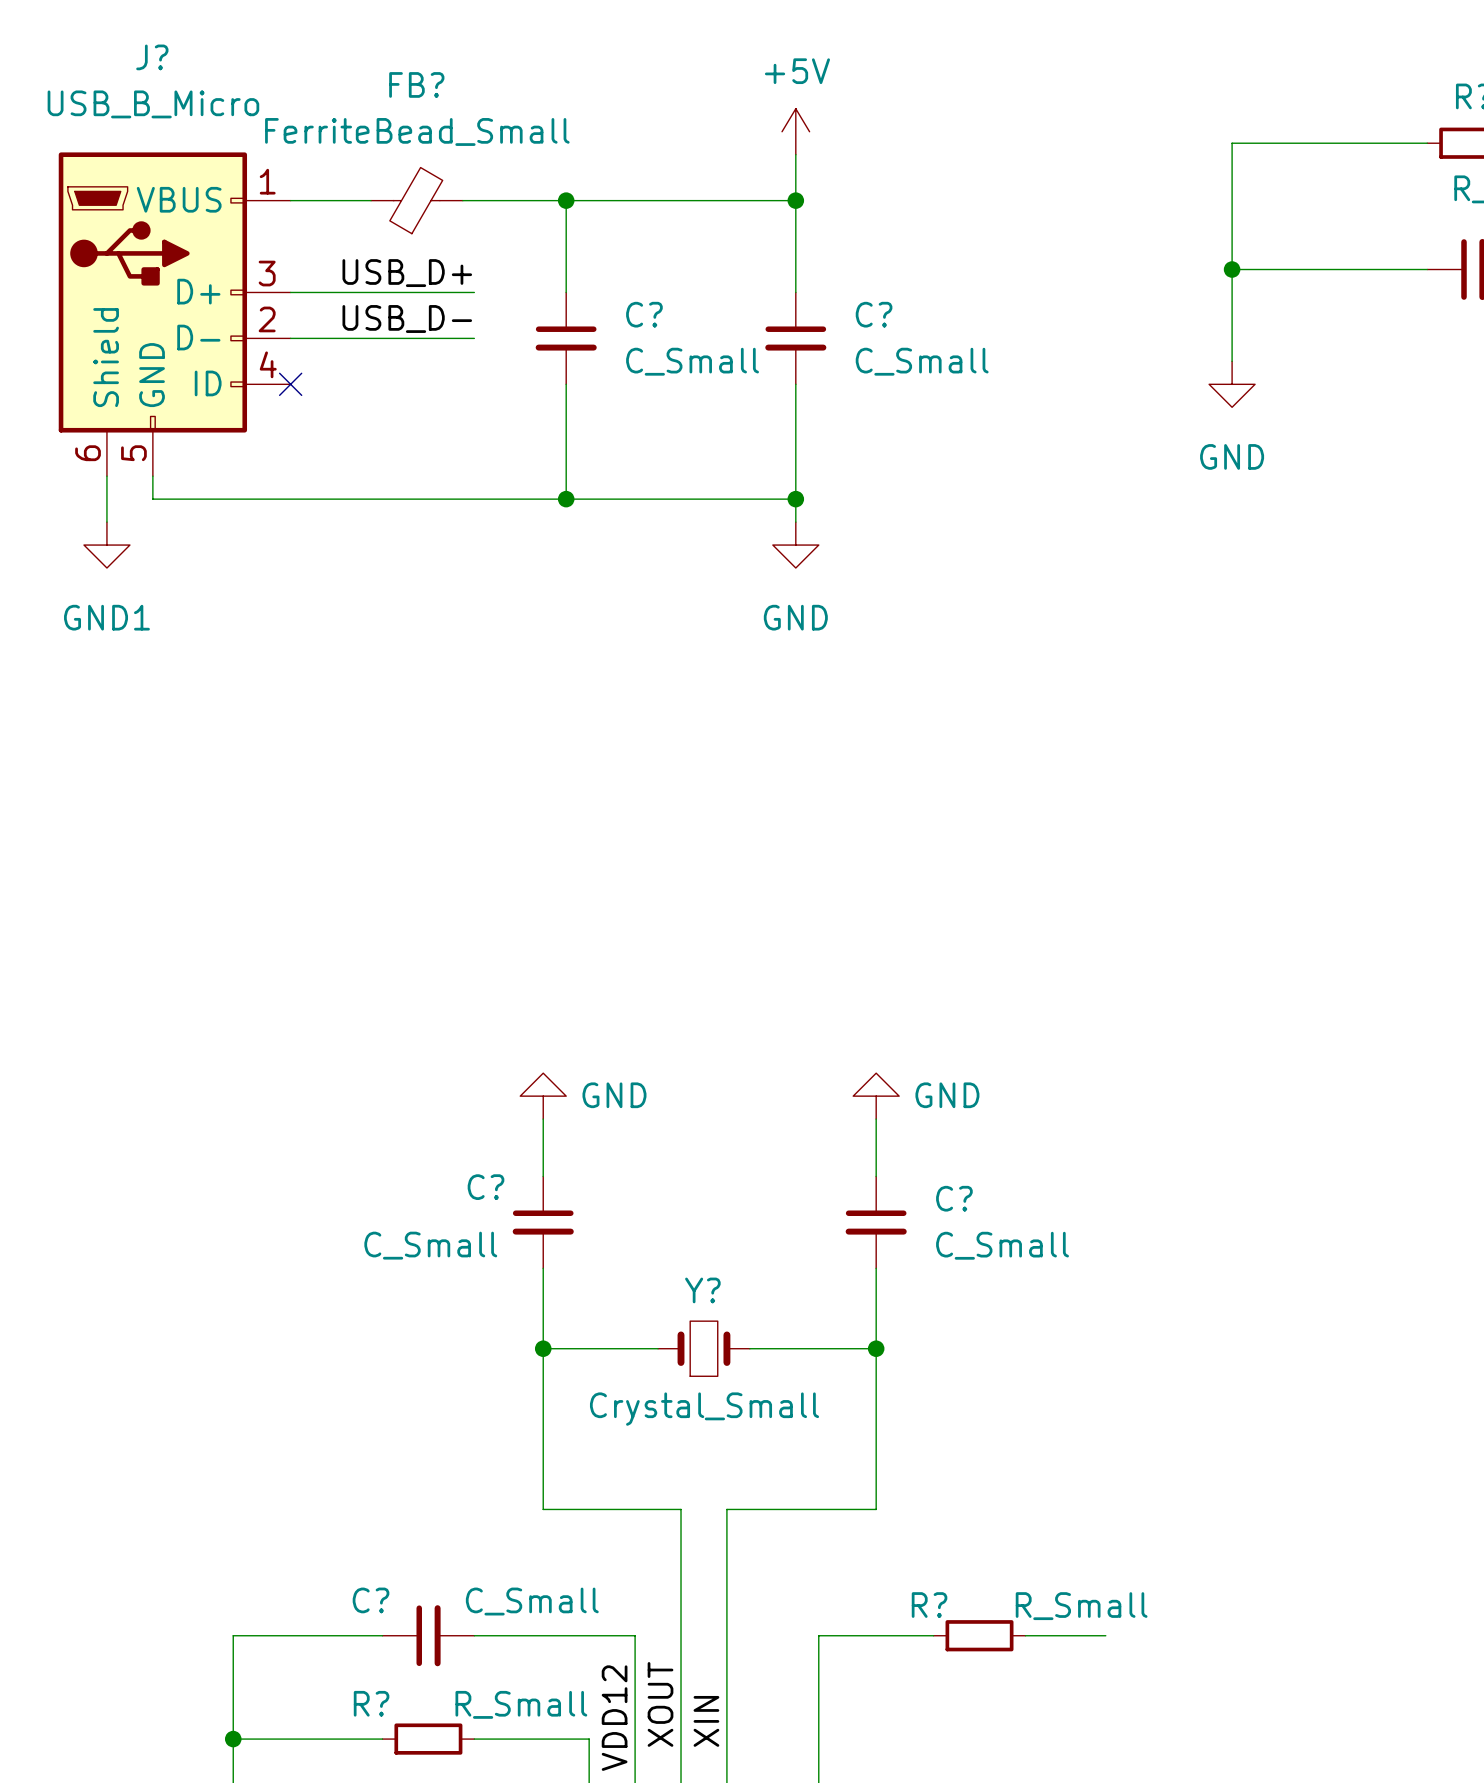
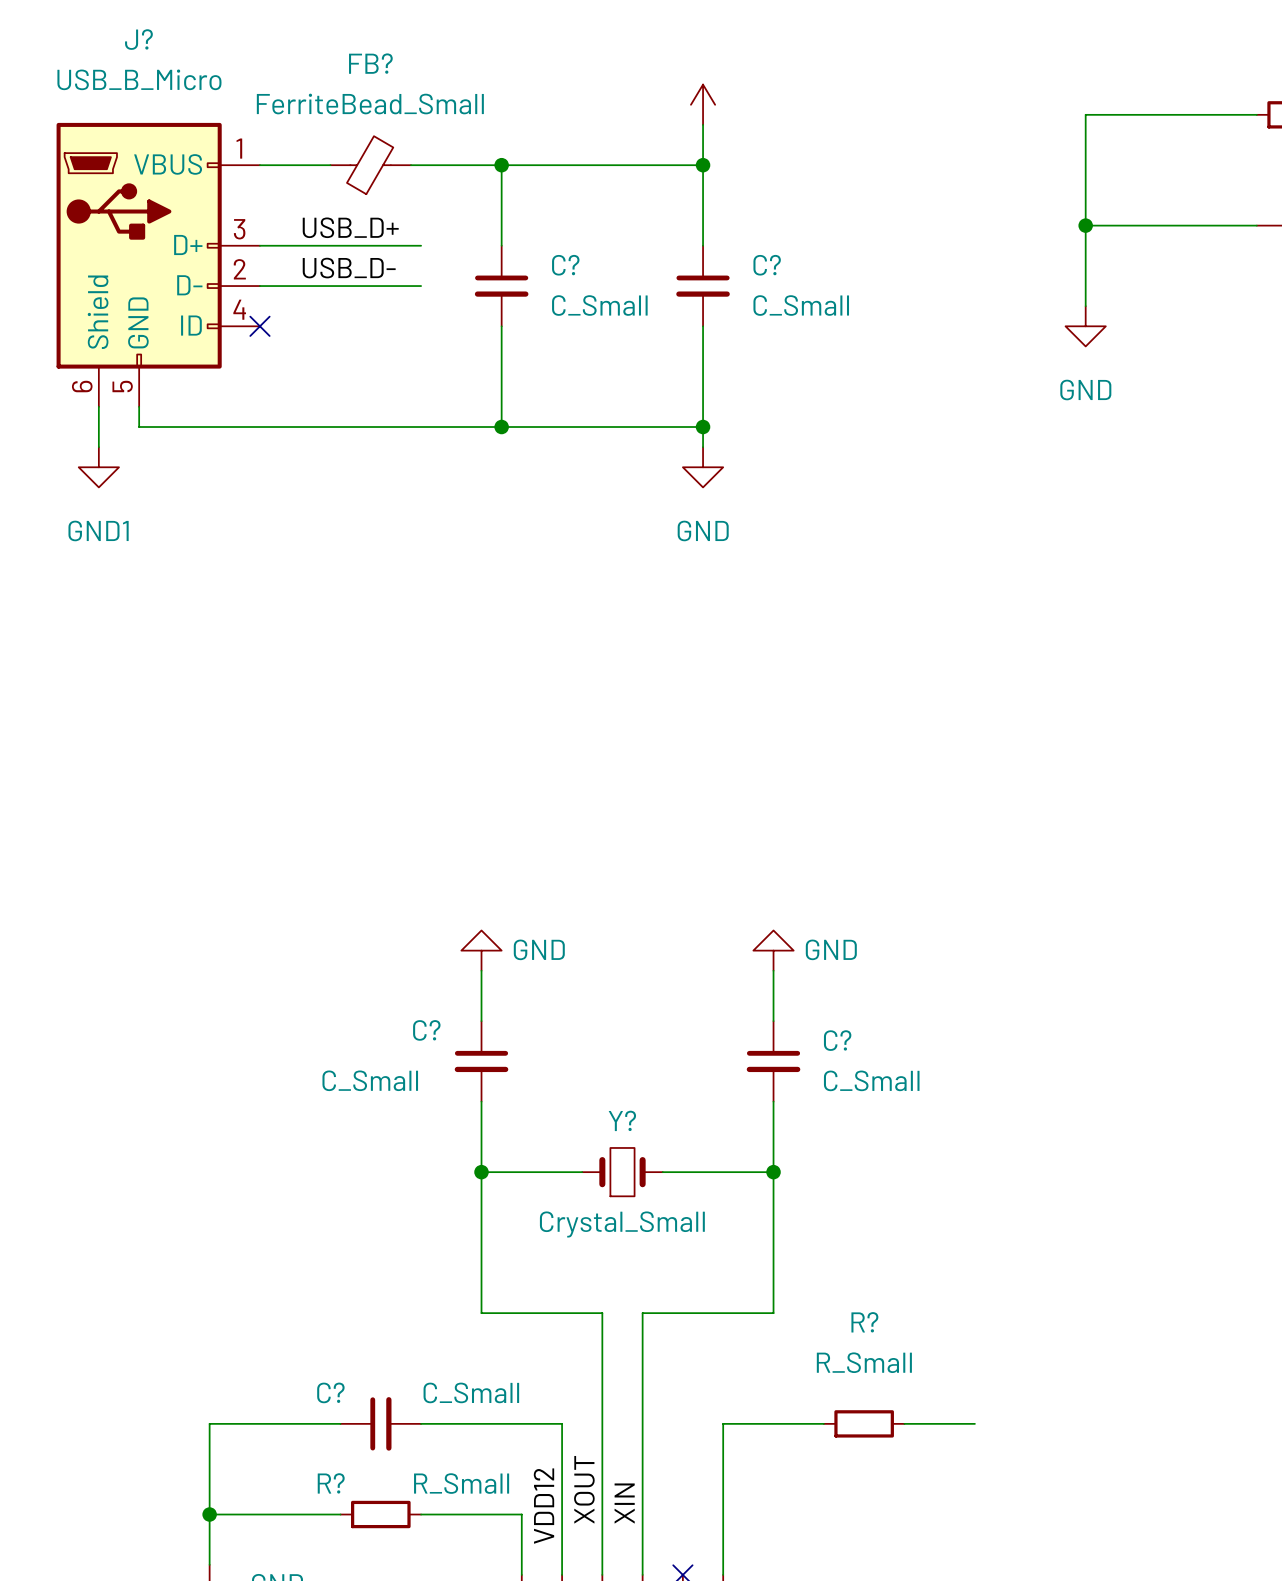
power symbol text: +5V (797, 71) -> none
R? name position: R? (929, 1605) -> R? (864, 1322)
R? value position: R_Small (1081, 1606) -> R_Small (864, 1362)

